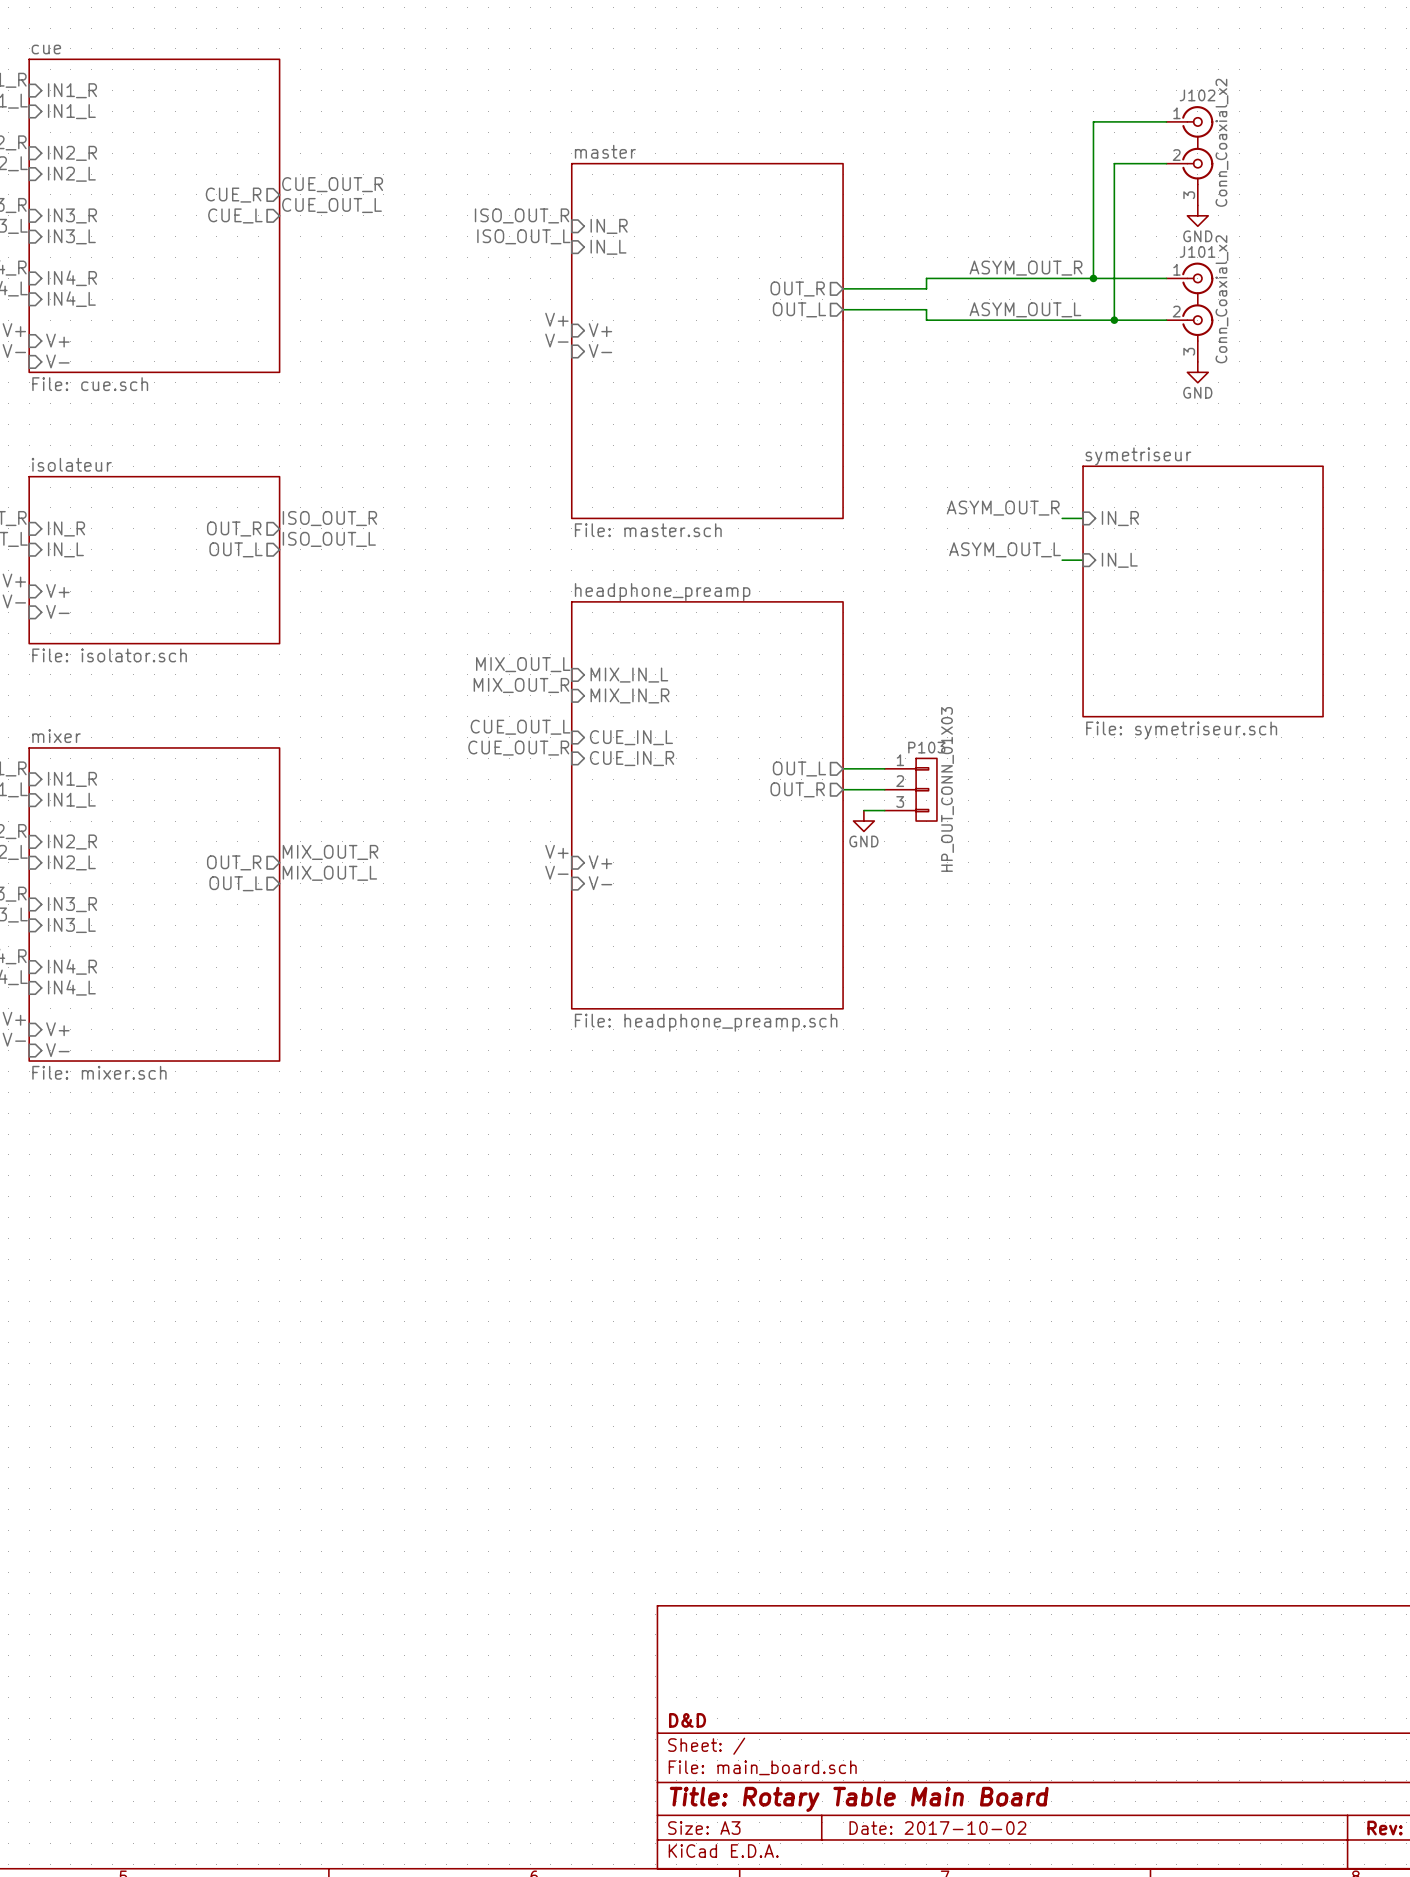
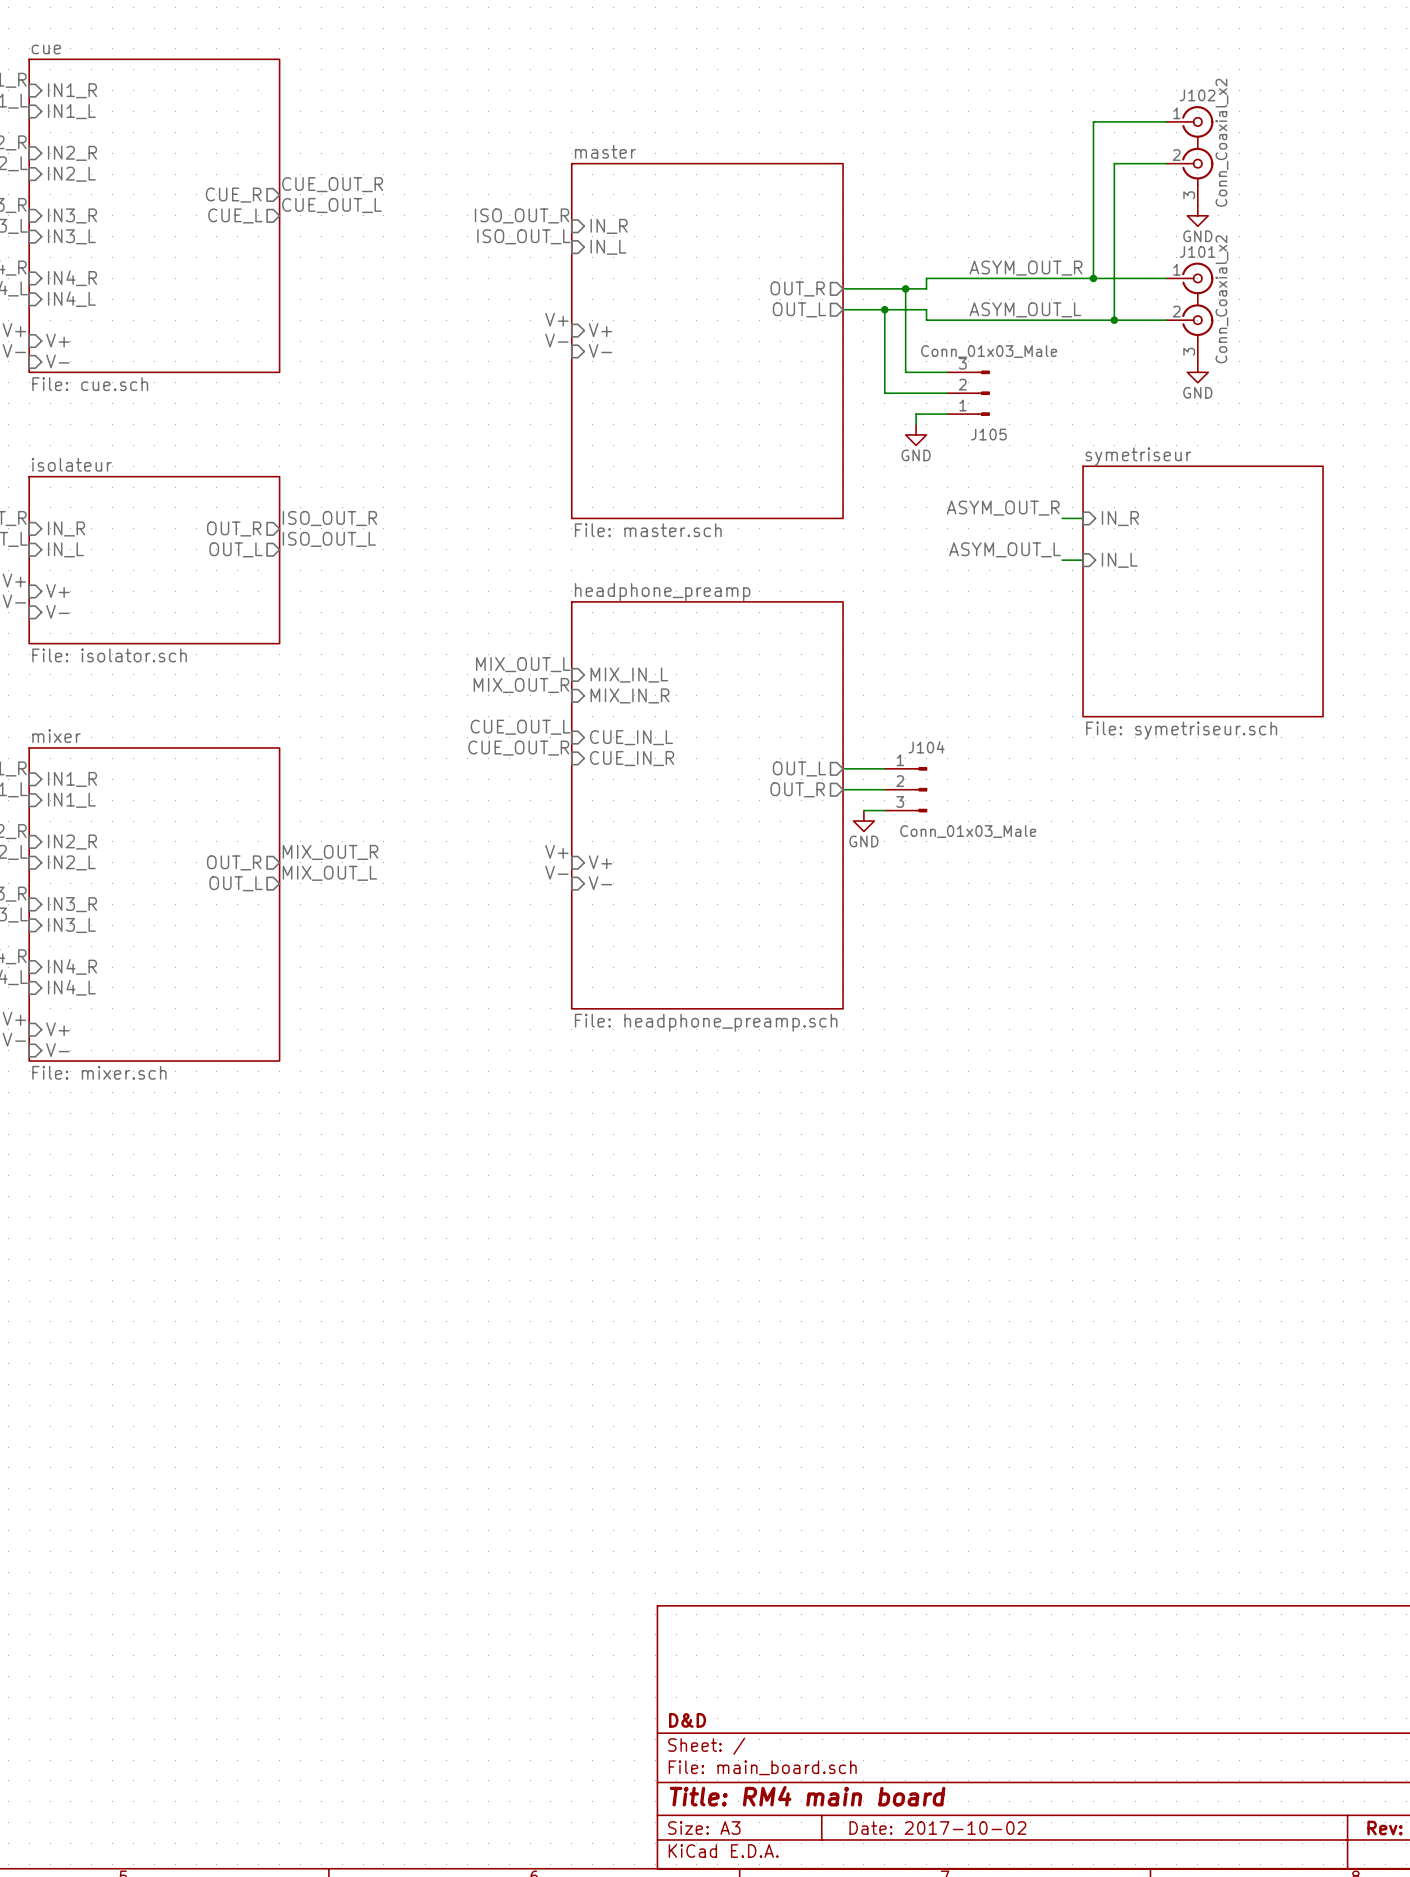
wire: none -> (905, 288) (905, 372) (947, 372)
junction: none -> (905, 288)
wire: none -> (884, 309) (884, 393) (947, 393)
junction: none -> (884, 309)
J105: none -> Conn_01x03_Male (968, 393)
wire: none -> (947, 414) (916, 414) (916, 424)
power symbol: none -> GND (916, 434)
J104: none -> Conn_01x03_Male (905, 789)
P103: HP_OUT_CONN_01X03 (910, 789) -> none
title block: Title: Rotary Table Main Board (859, 1799) -> Title: RM4 main board (807, 1796)

